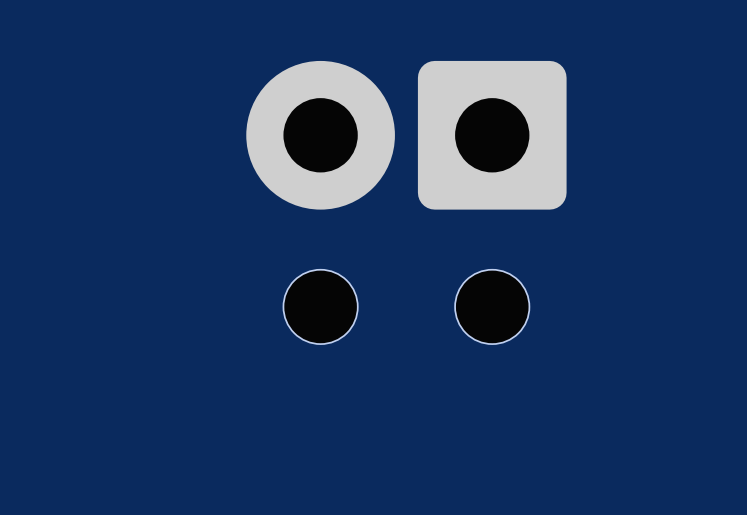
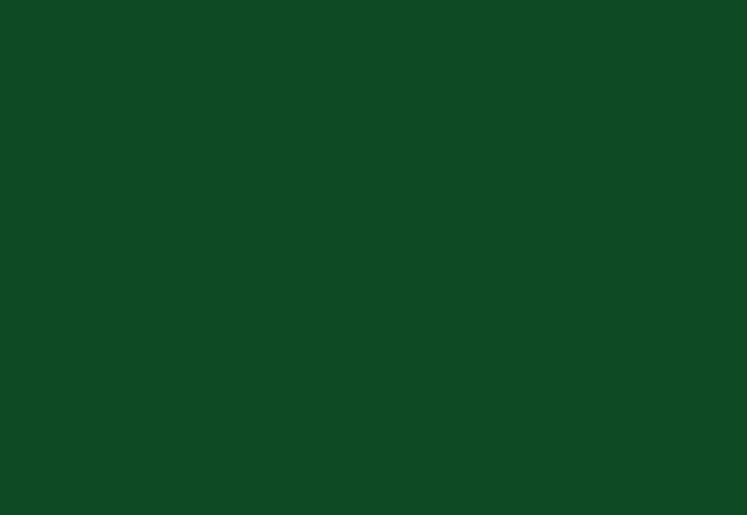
part: (406, 202) -> none

